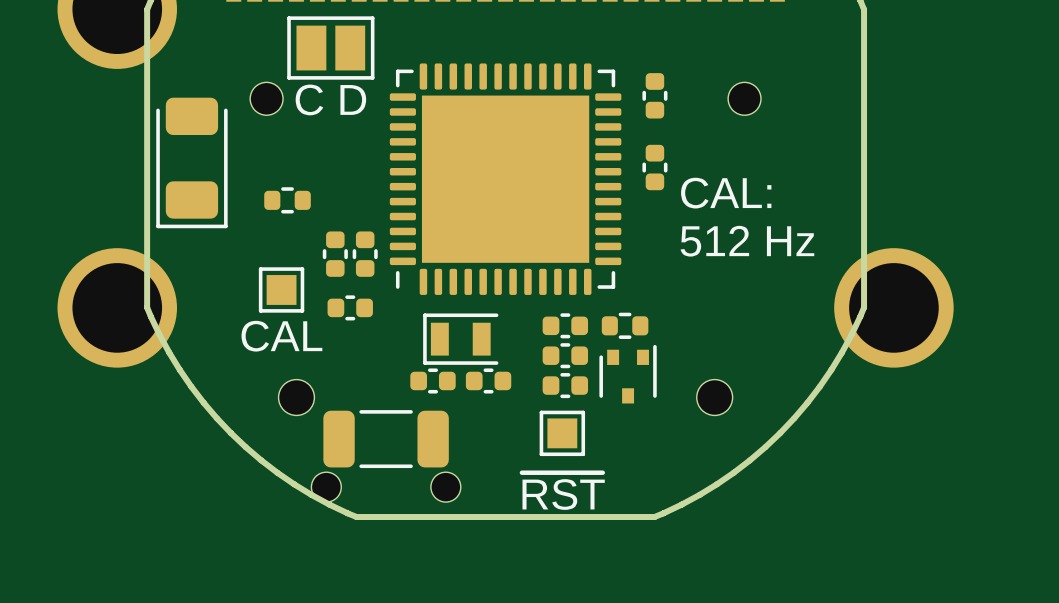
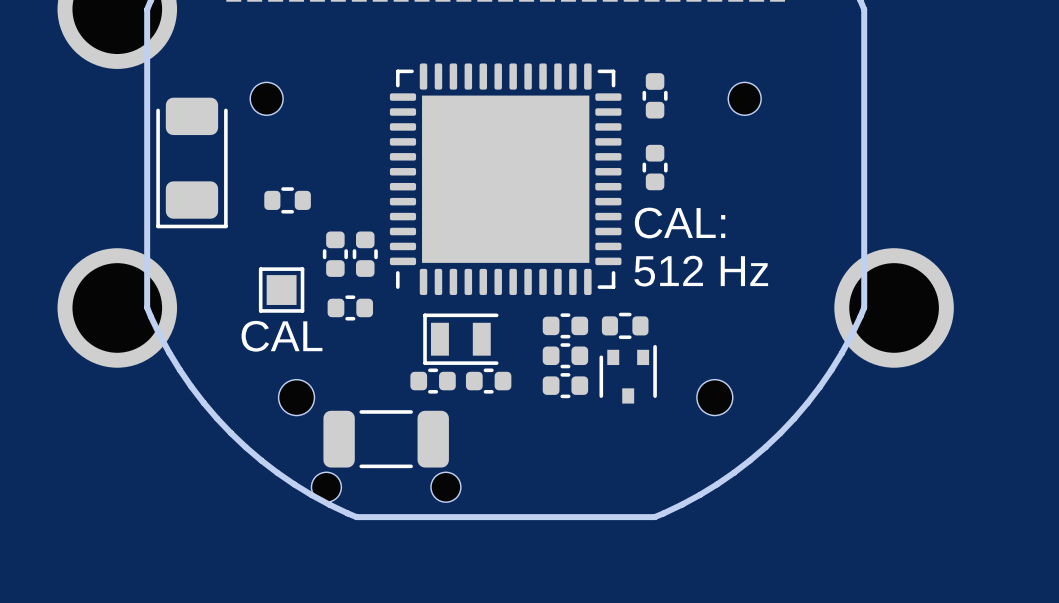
part: (330, 48) -> none
text: C D (330, 99) -> none
text position: CAL: (726, 193) -> CAL: (680, 223)
text position: 512 Hz (747, 241) -> 512 Hz (701, 271)
part: (562, 433) -> none
text: ~{RST} (563, 491) -> none

